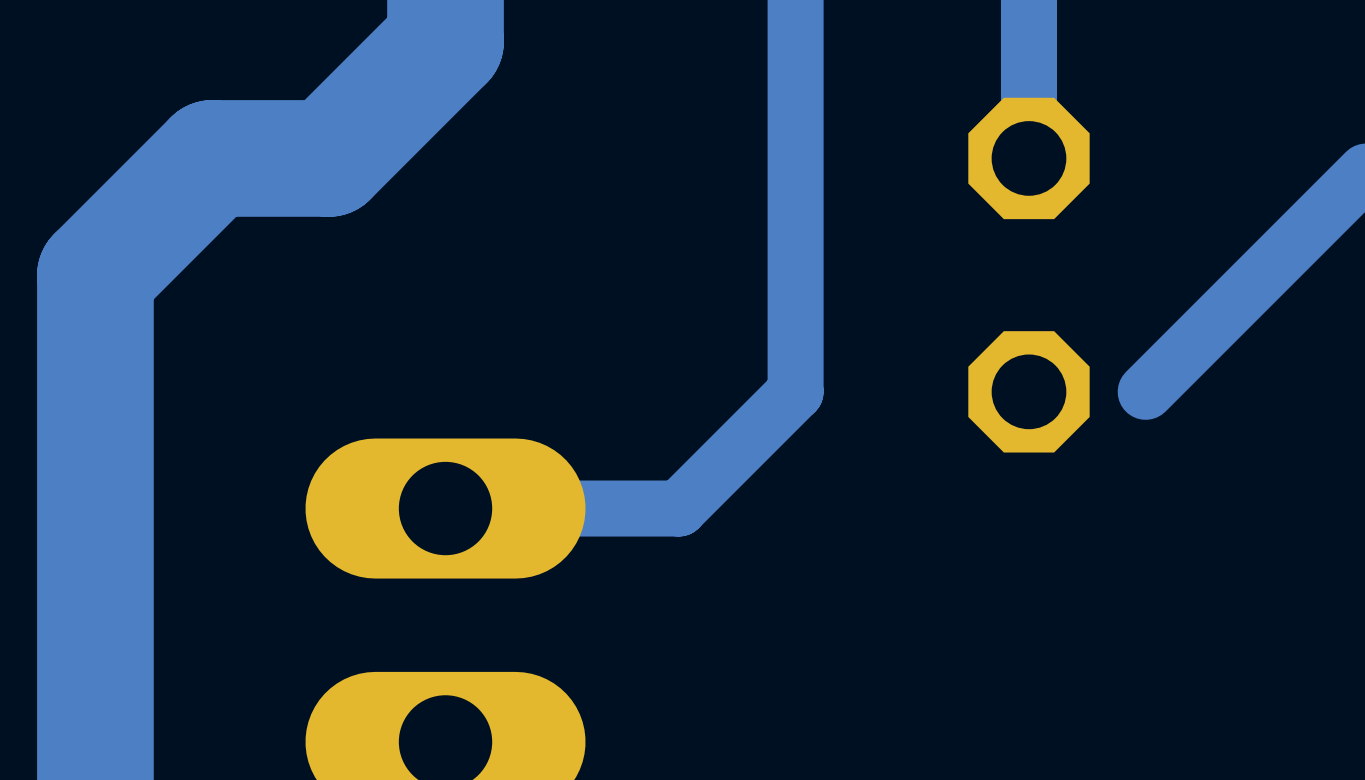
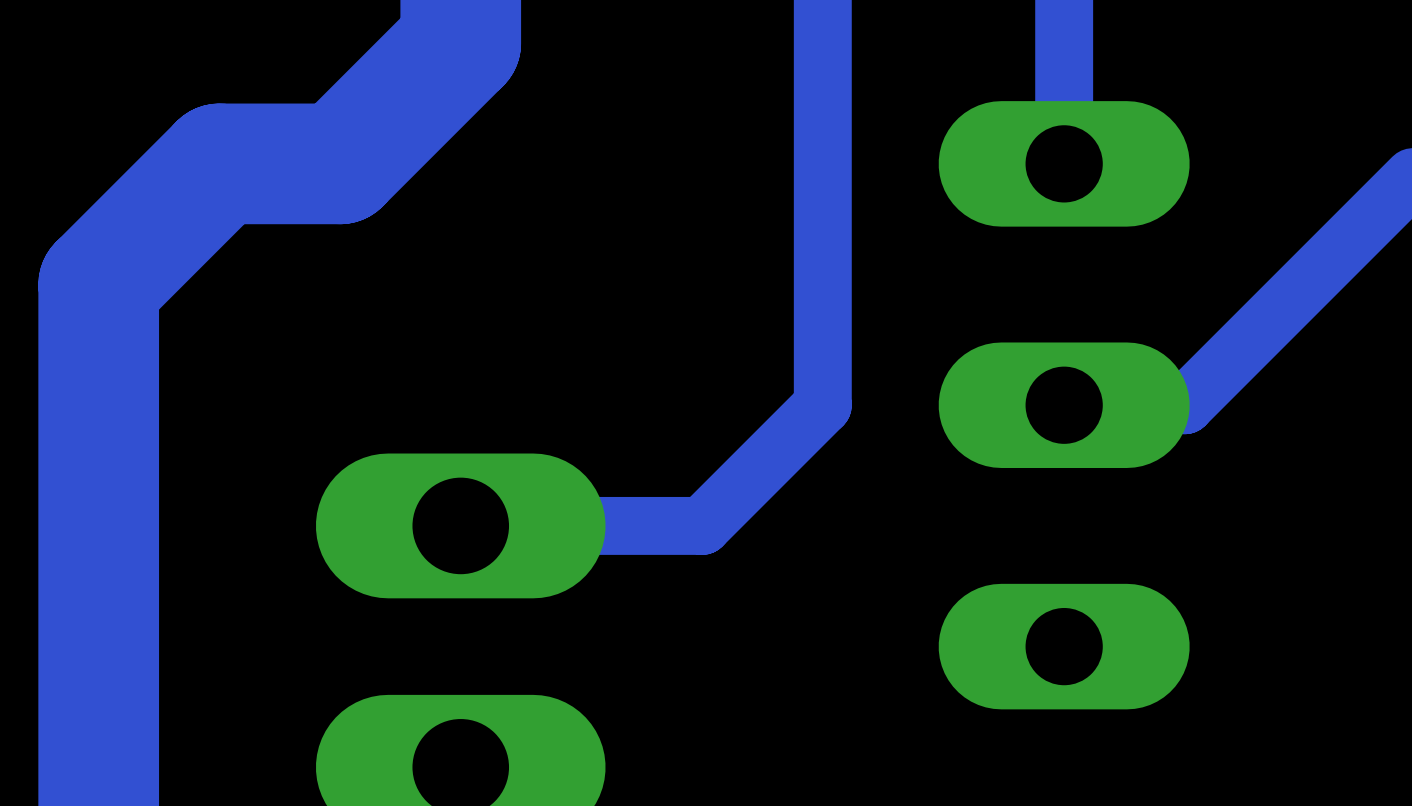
part: (1028, 275) -> none
part: none -> (1064, 405)

